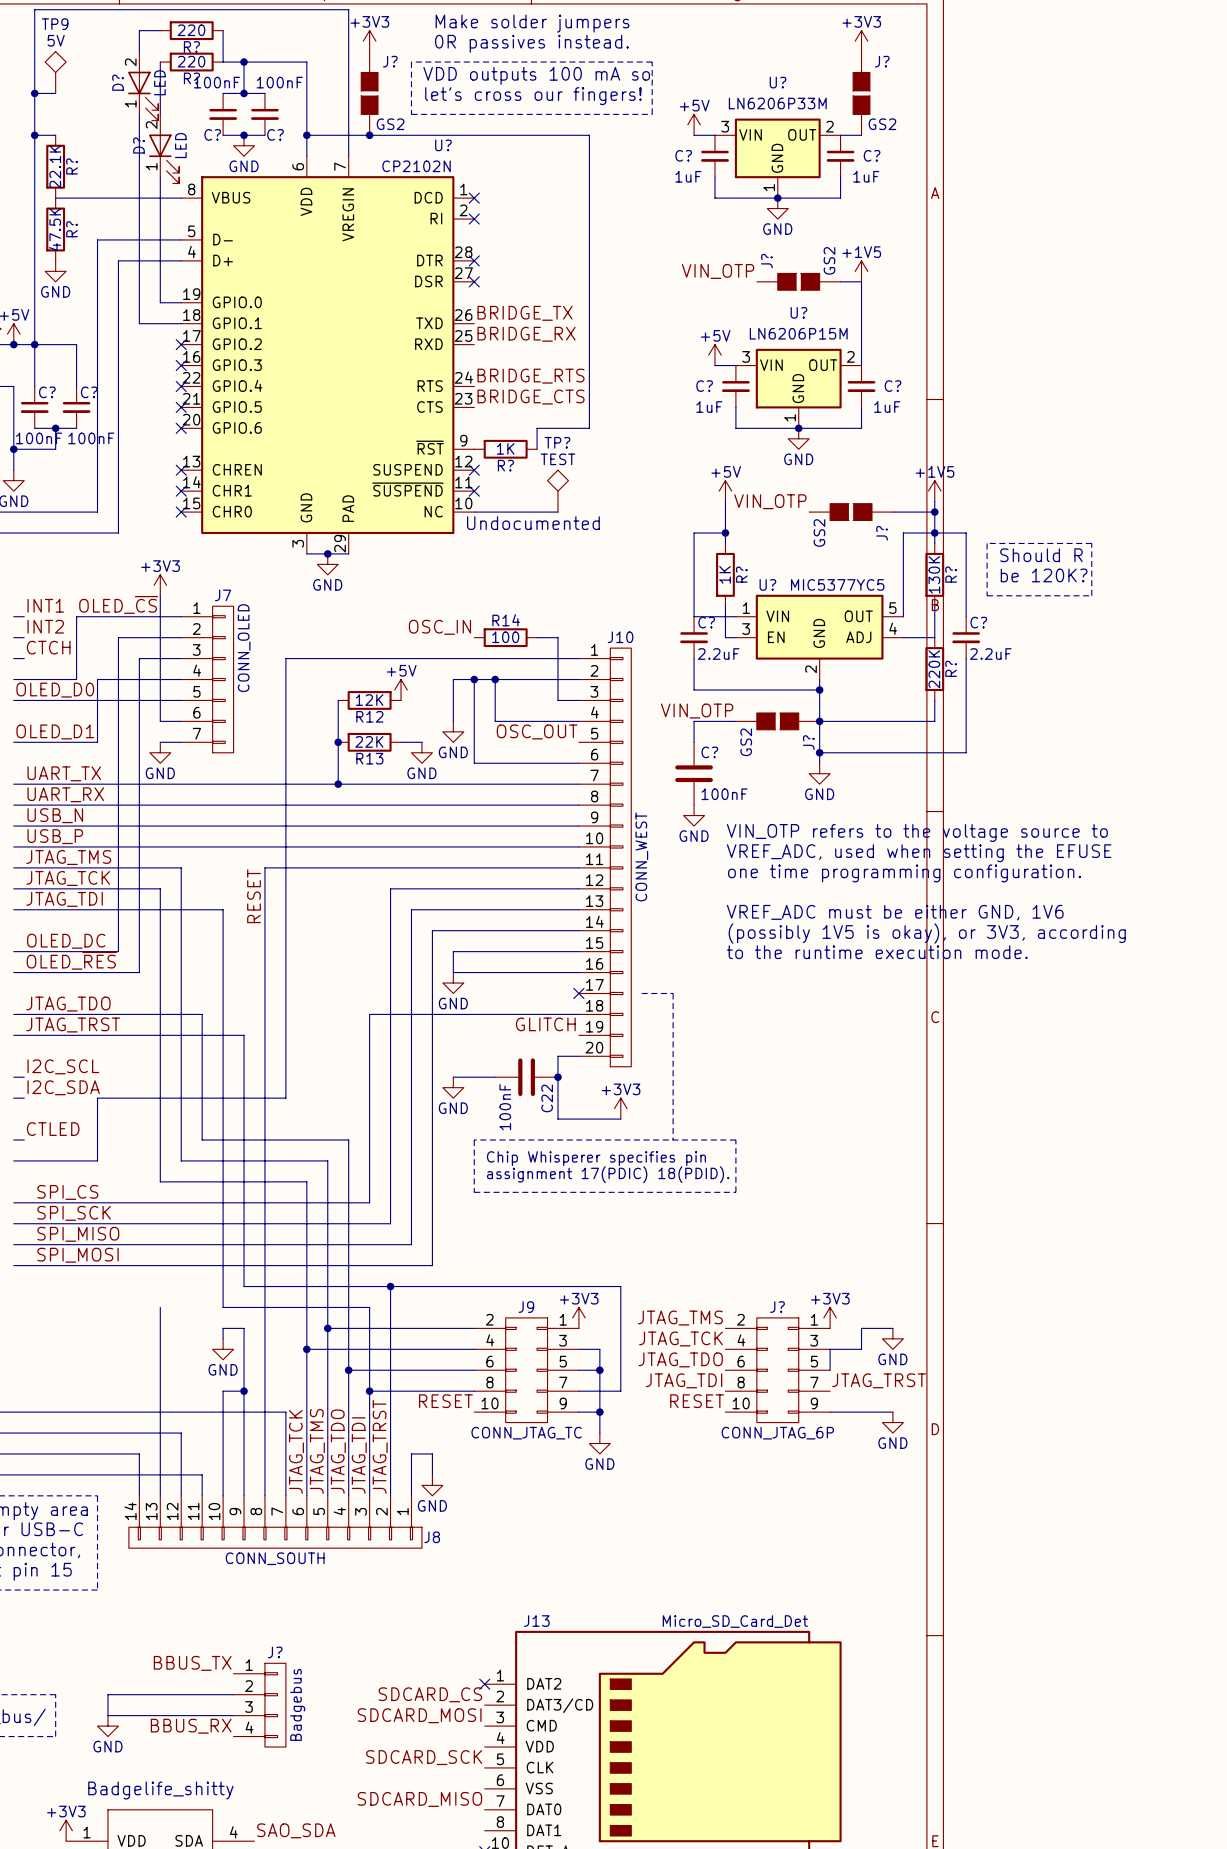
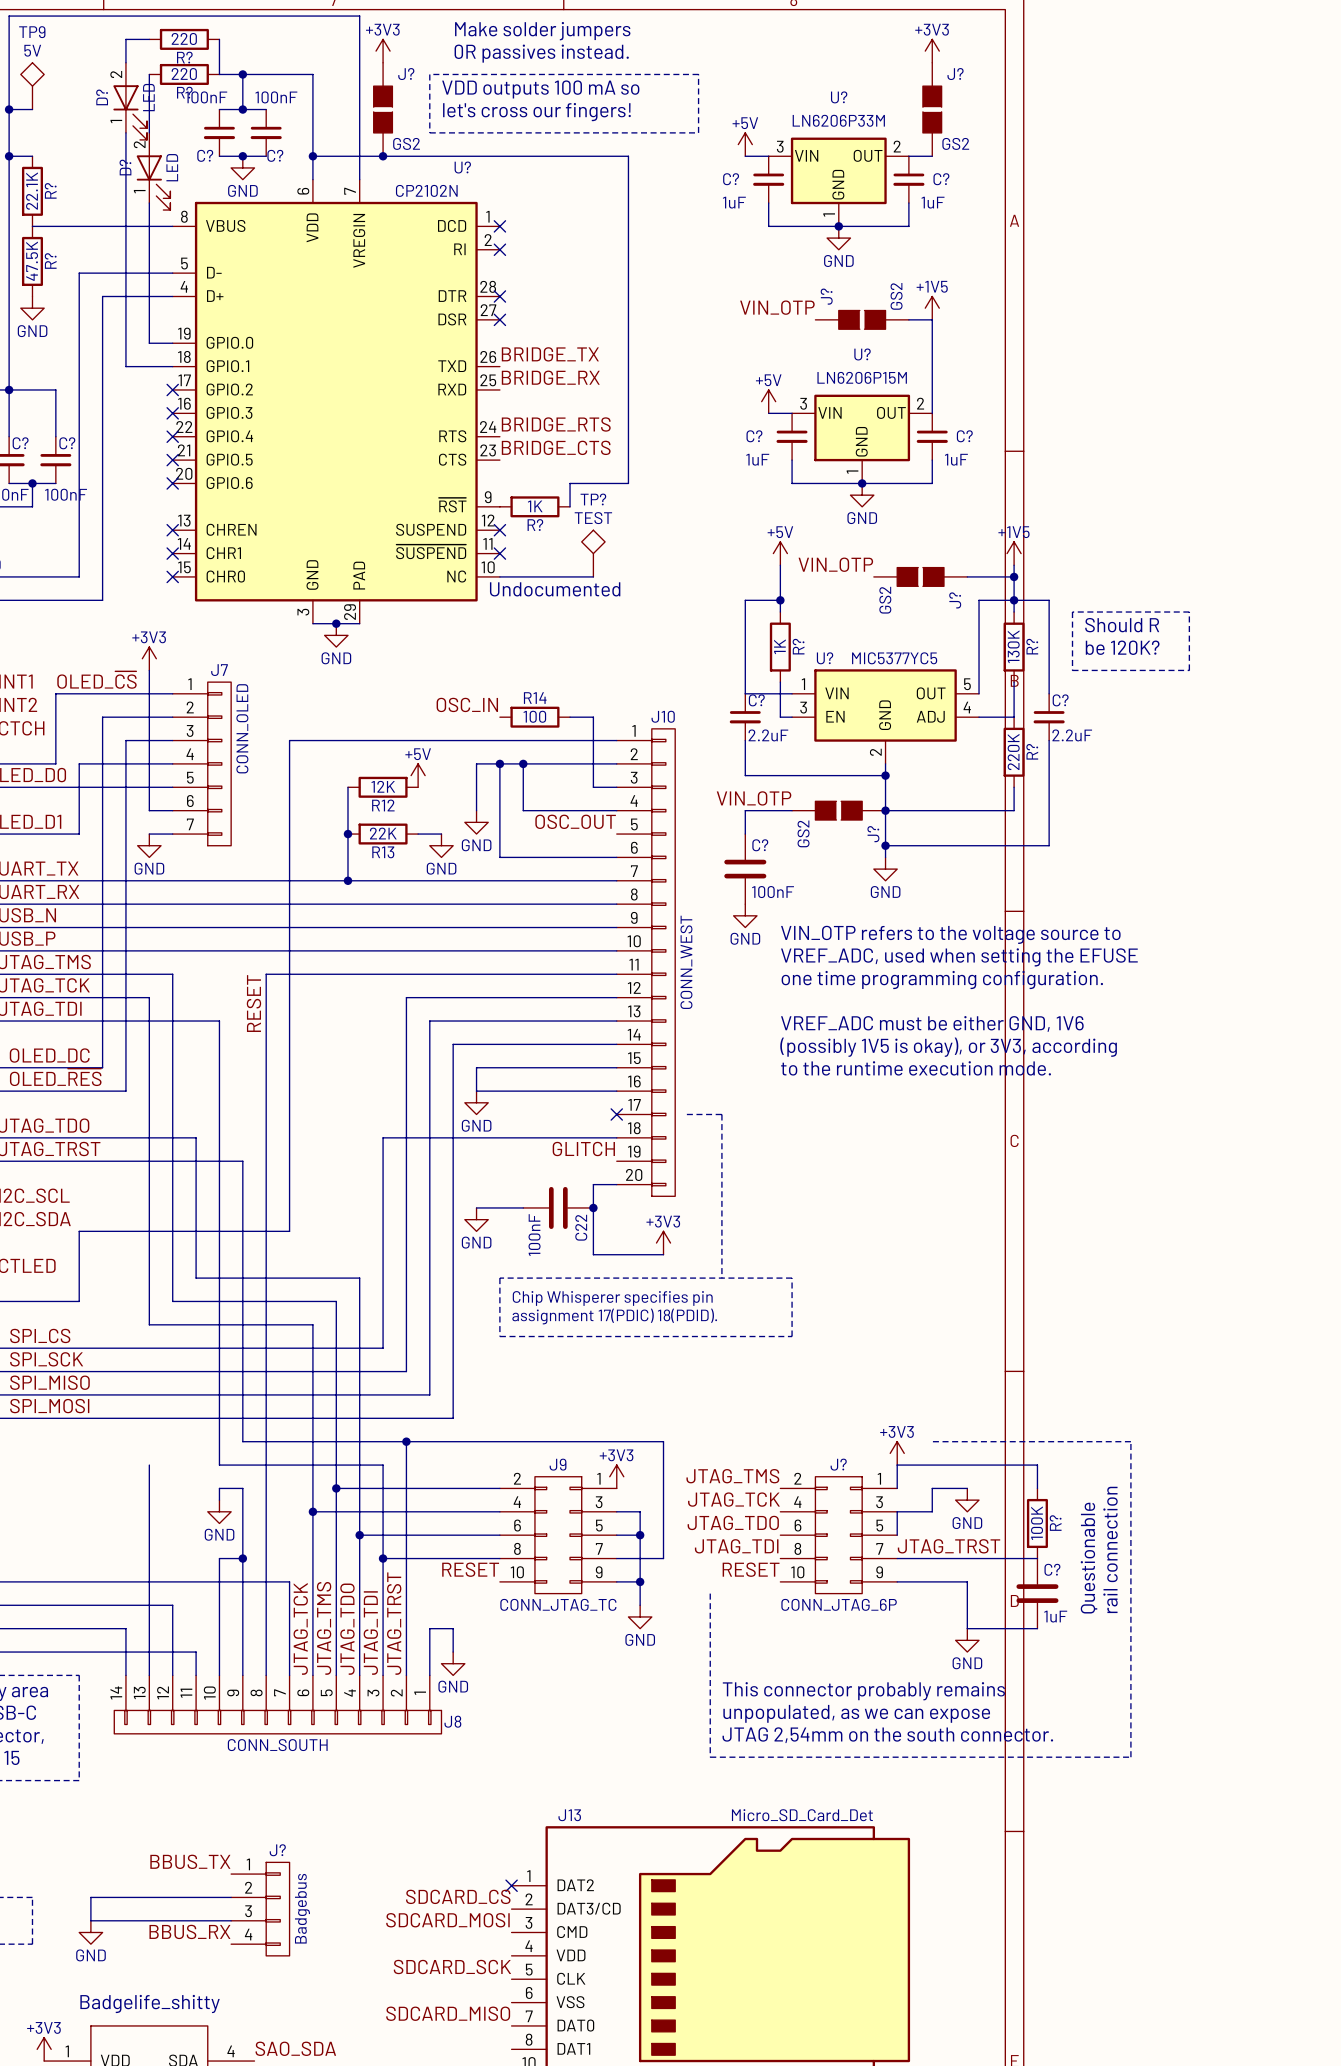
line: none -> (932, 1441) (1130, 1441) (1130, 1757) (710, 1757) (710, 1593)
power symbol position: +3V3 (830, 1317) -> +3V3 (897, 1453)
wire: none -> (897, 1488) (897, 1465) (1037, 1465) (1037, 1488)
R?: none -> 100K (1037, 1523)
text: none -> rail connection (1110, 1549)
text: none -> Questionable (1088, 1558)
wire: none -> (897, 1558) (1037, 1558)
wire: none -> (967, 1581) (967, 1628) (1037, 1628)
power symbol position: GND (892, 1422) -> GND (967, 1640)
C?: none -> 1uF (1037, 1593)
text: none -> This connector probably remains (863, 1691)
text: none -> unpopulated, as we can expose (856, 1713)
text: none -> JTAG 2,54mm on the south connector. (887, 1735)

